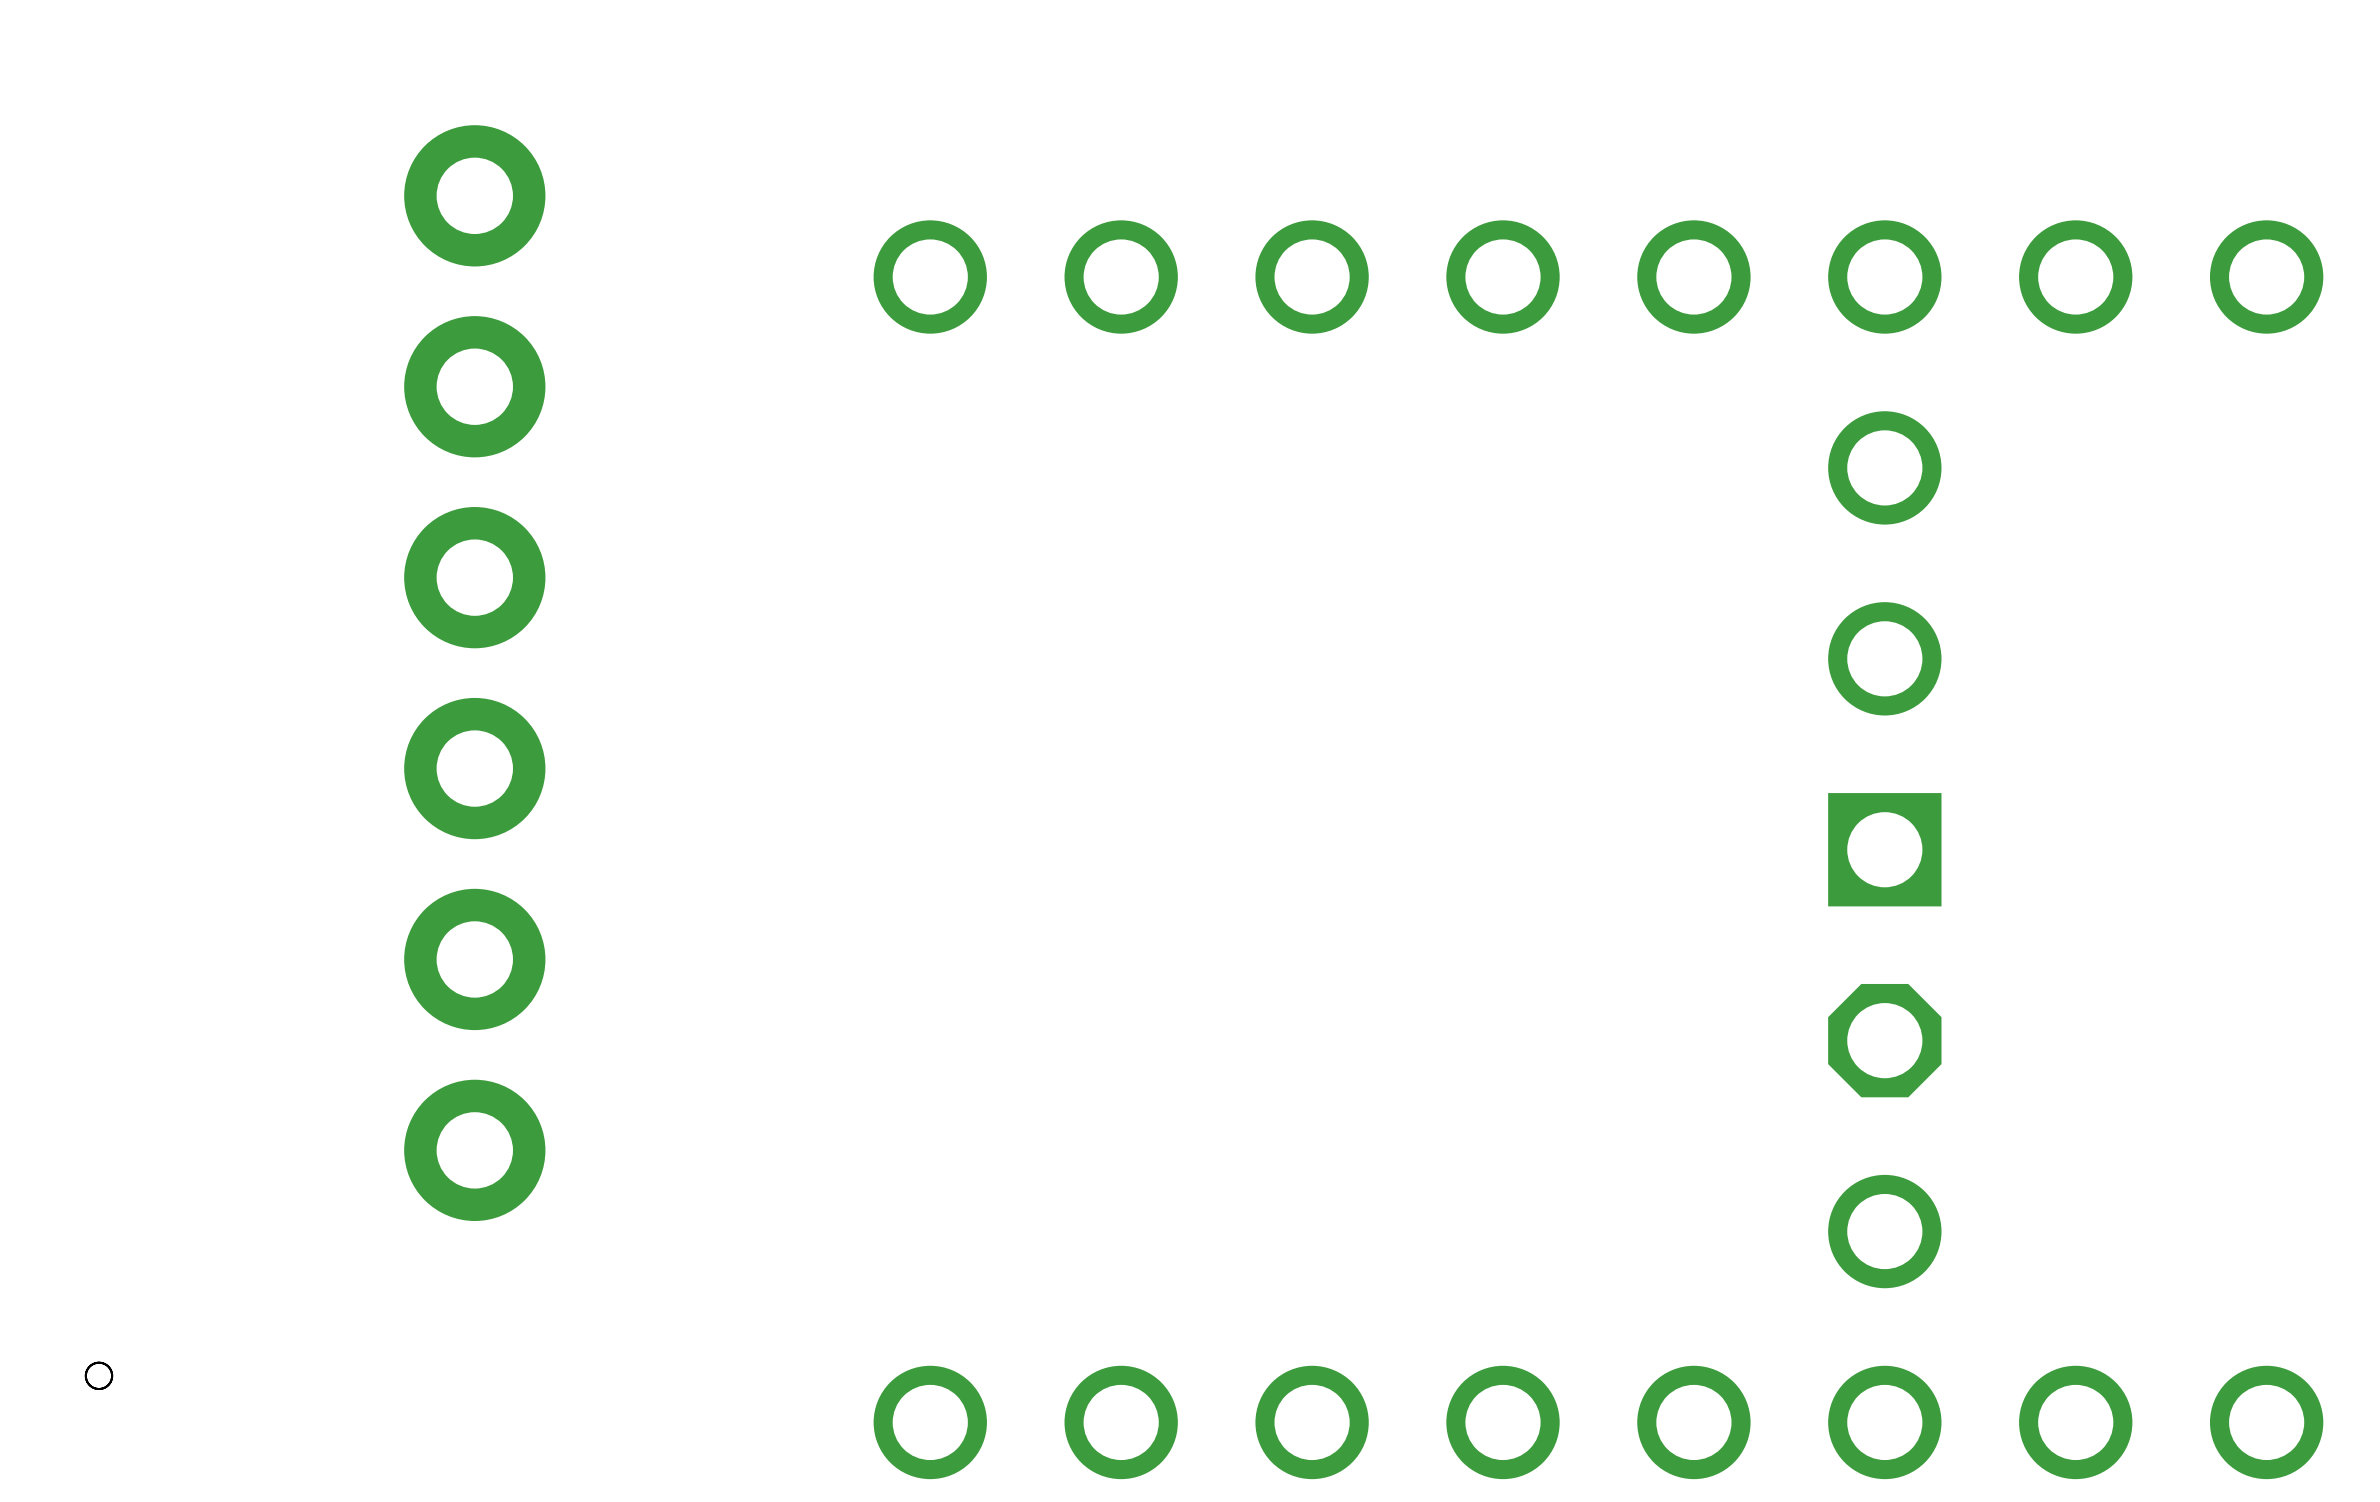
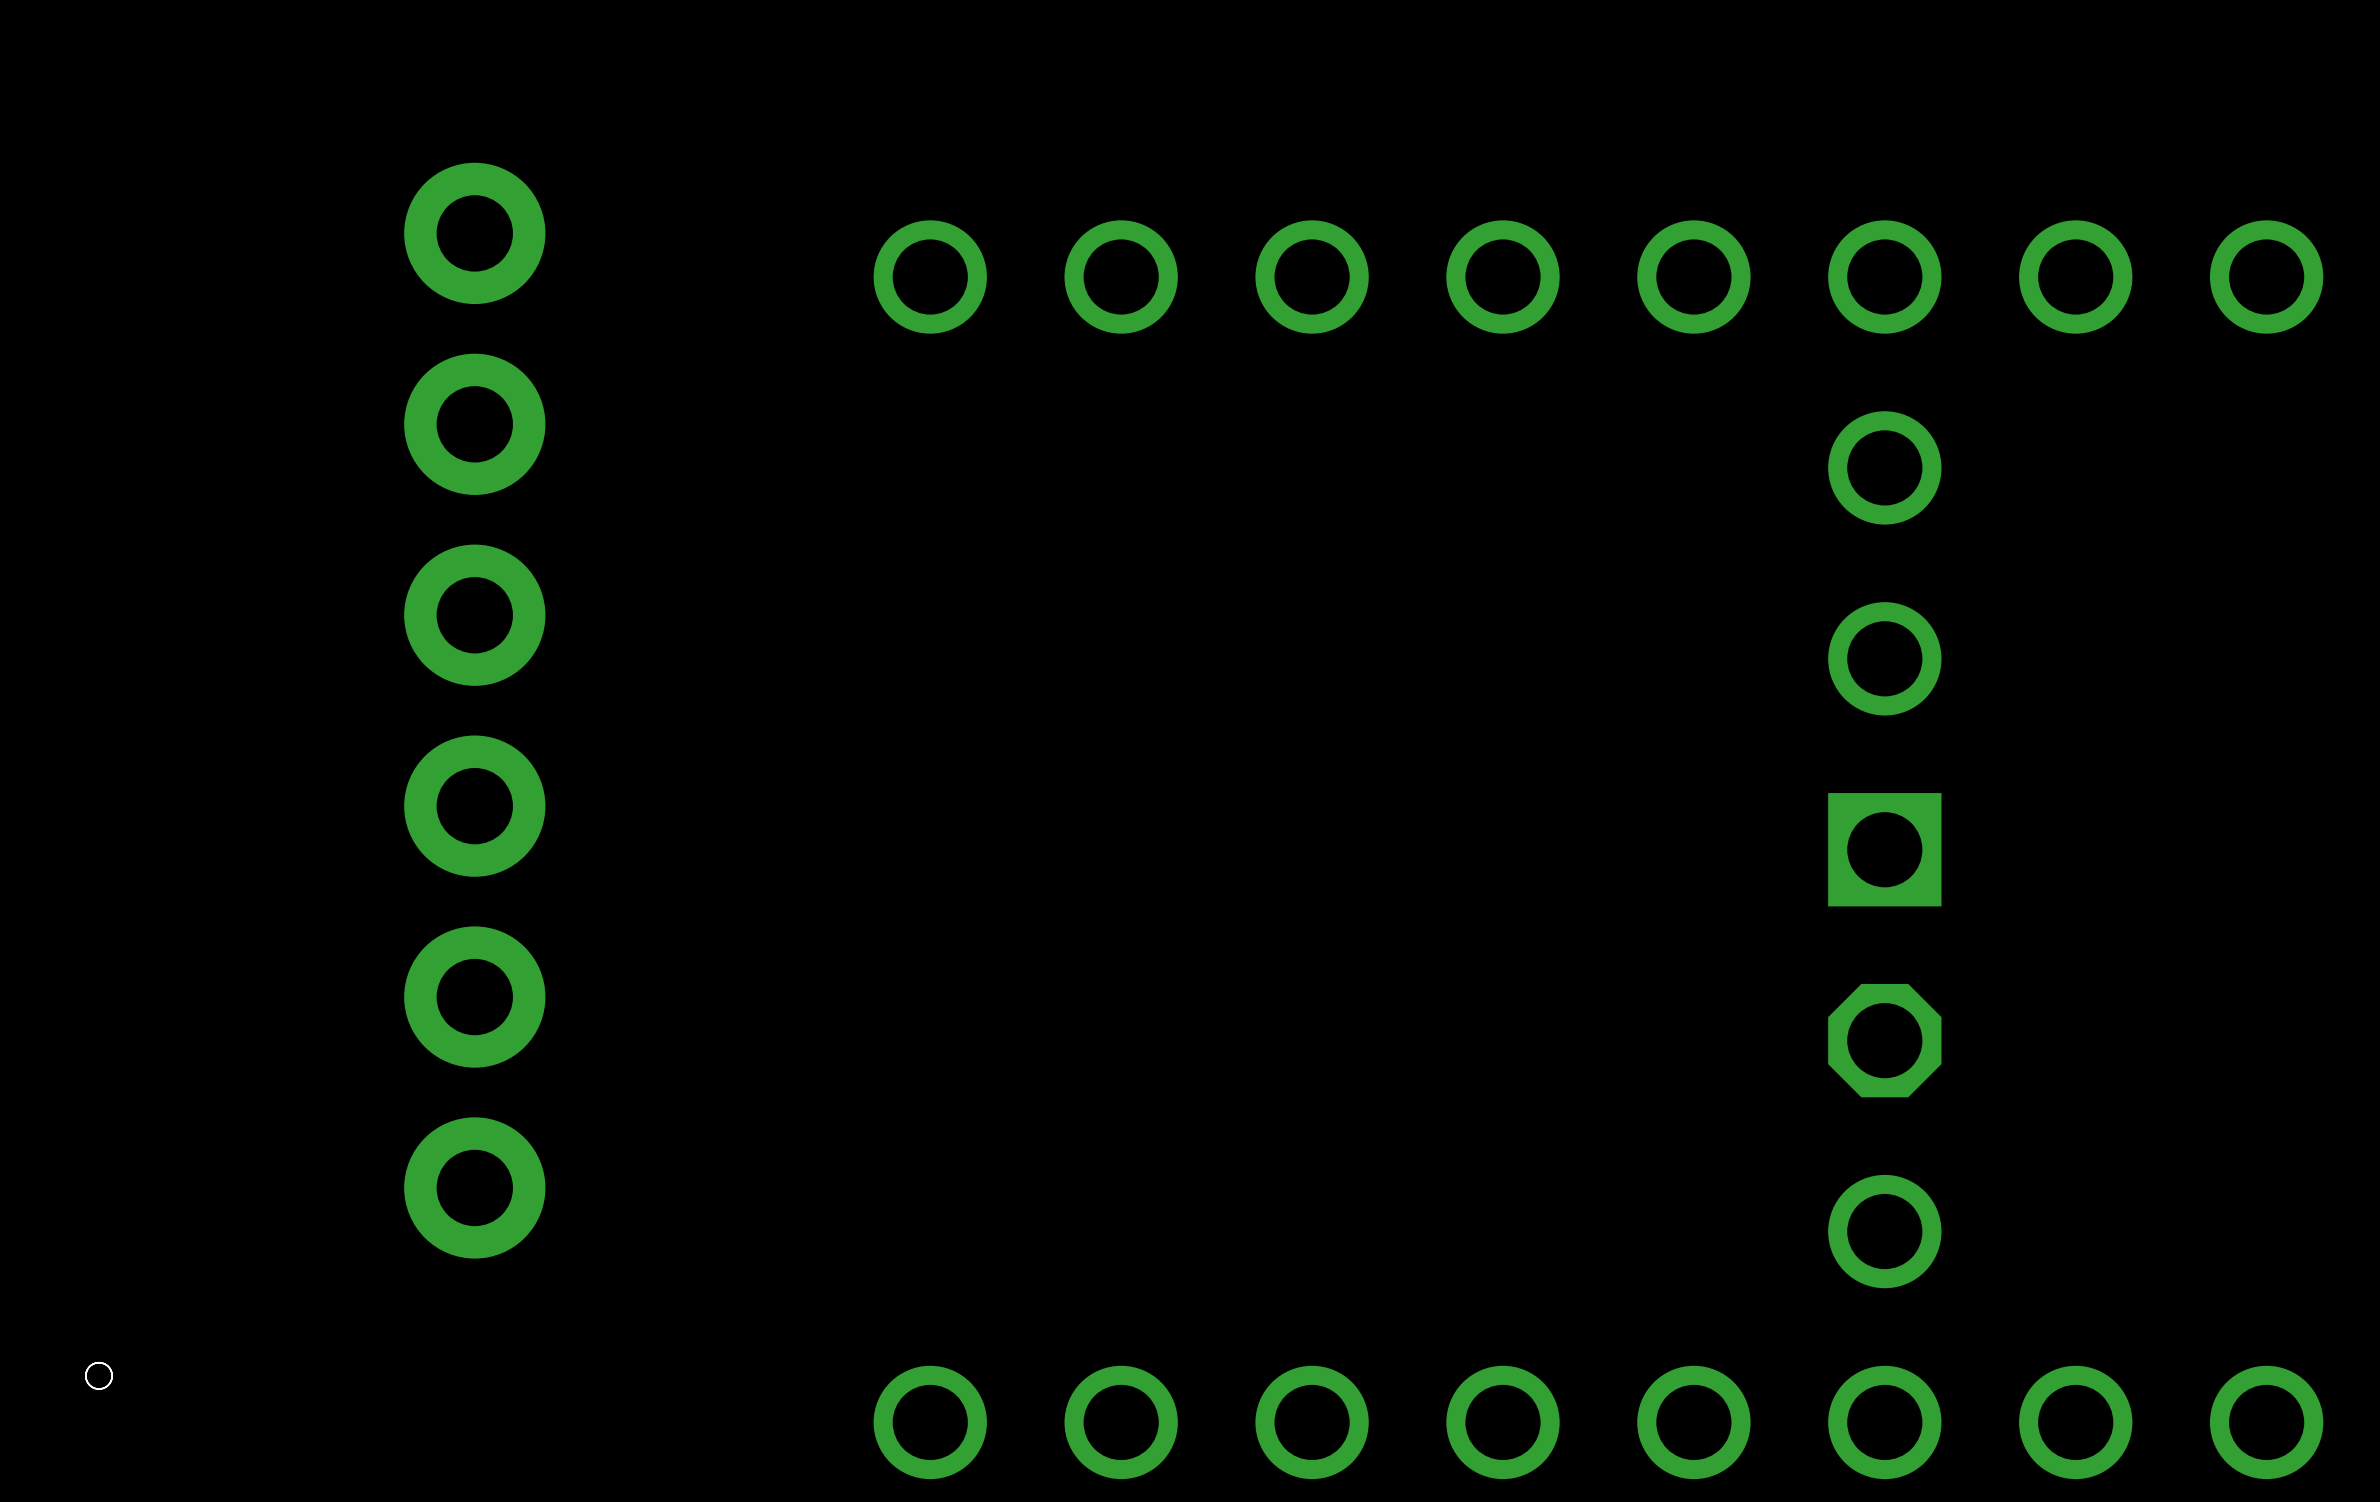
part position: (474, 673) -> (474, 710)

